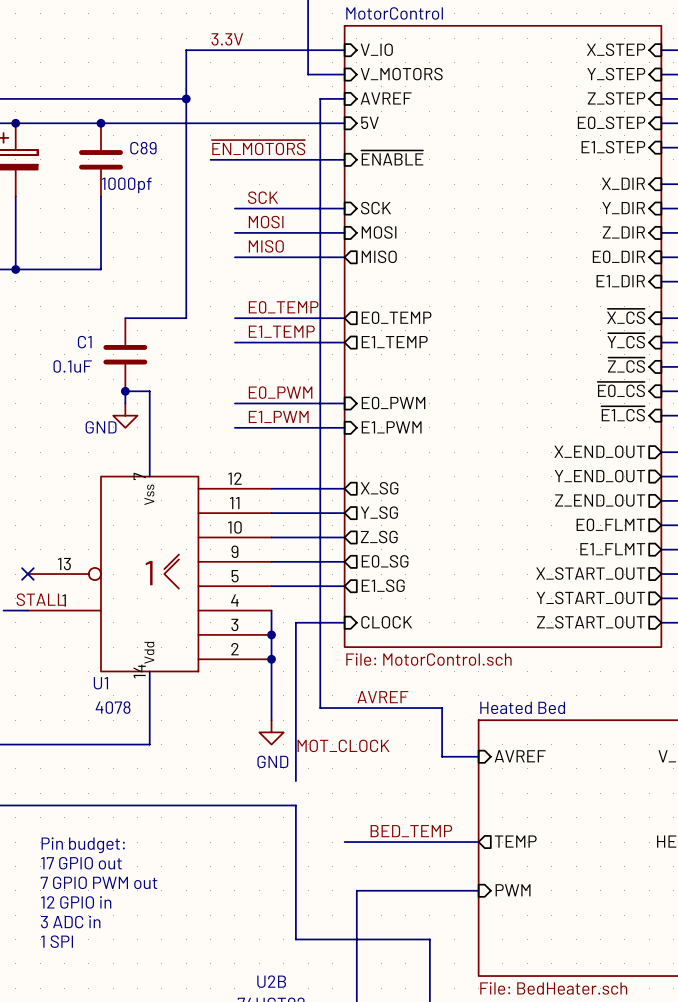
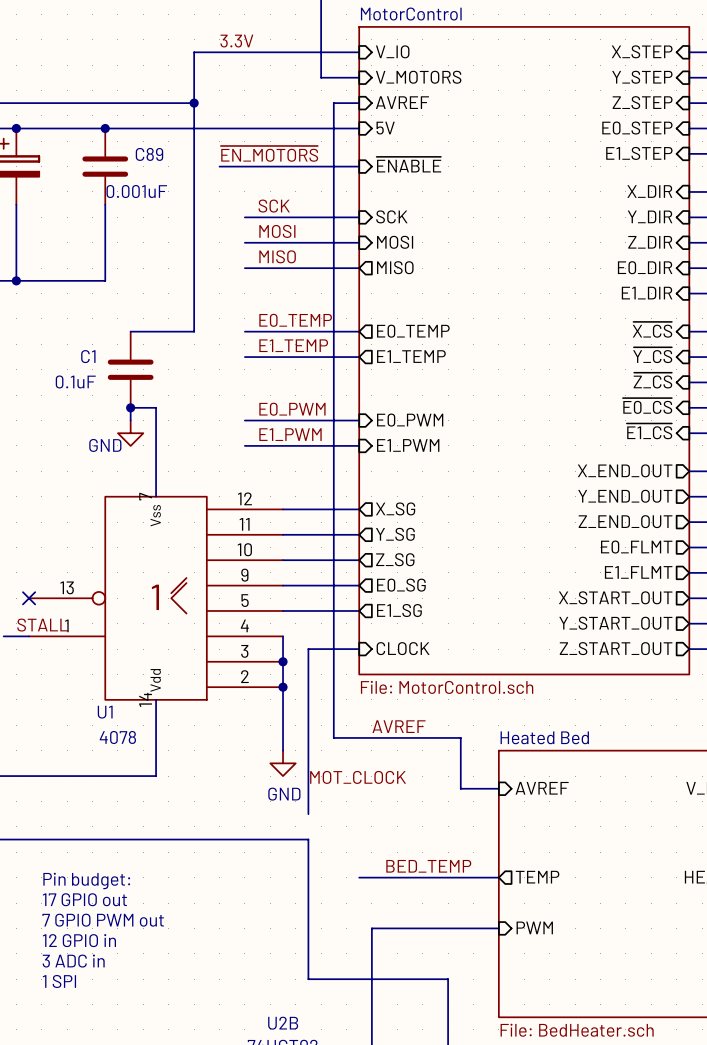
C89 value: 1000pf (126, 185) -> 0.001uF (136, 191)

